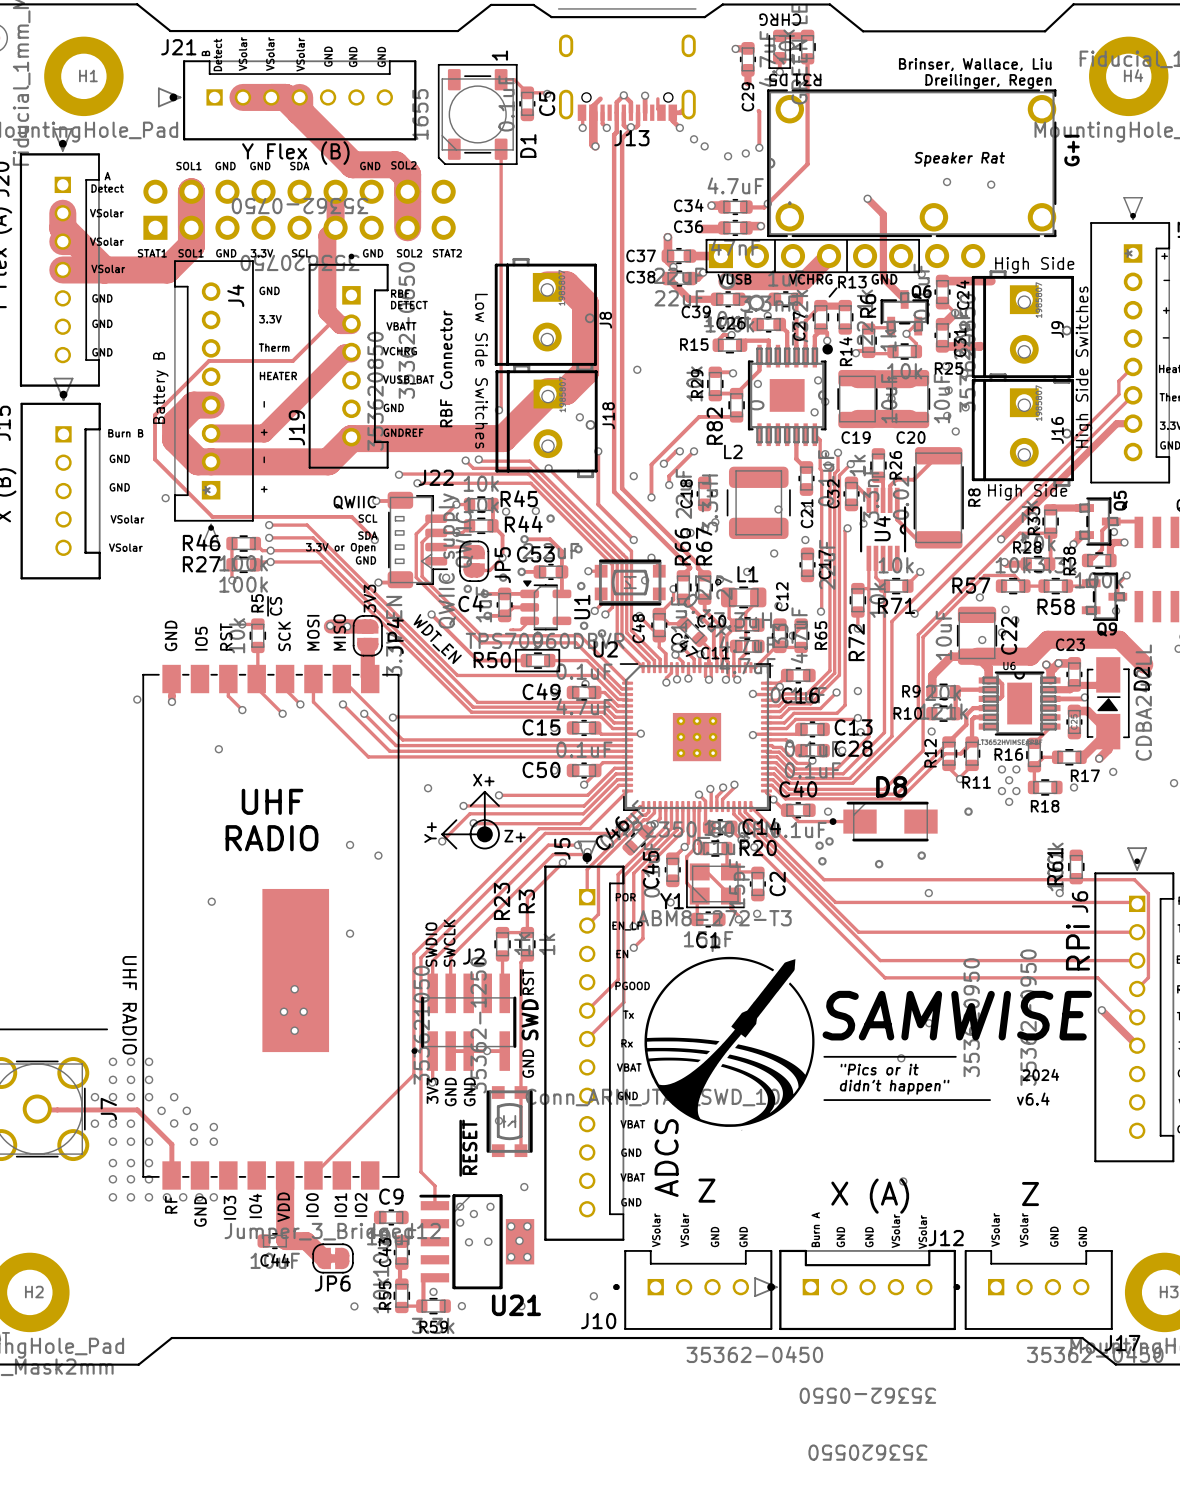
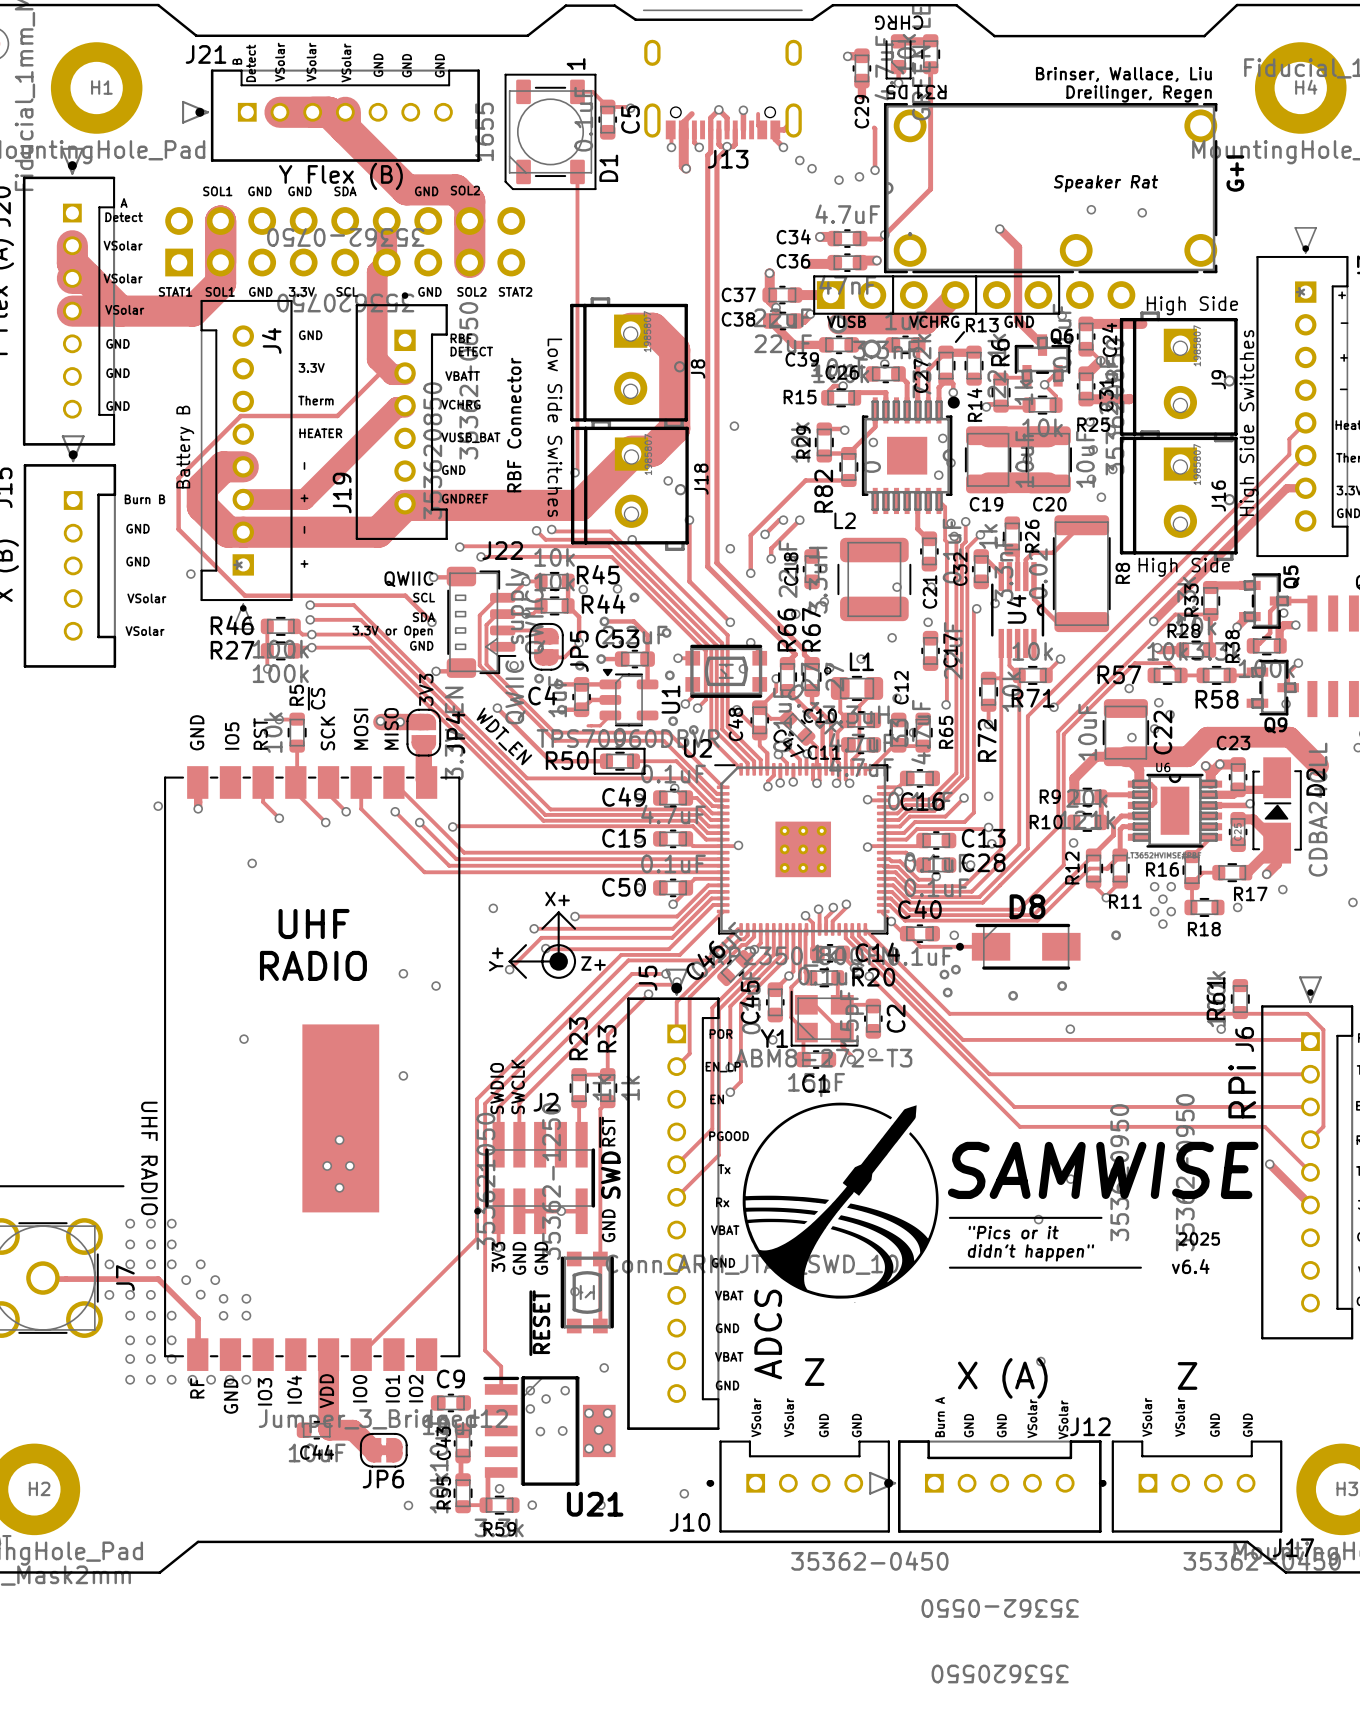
text: 2024 (1040, 1074) -> 2025 (1199, 1239)

